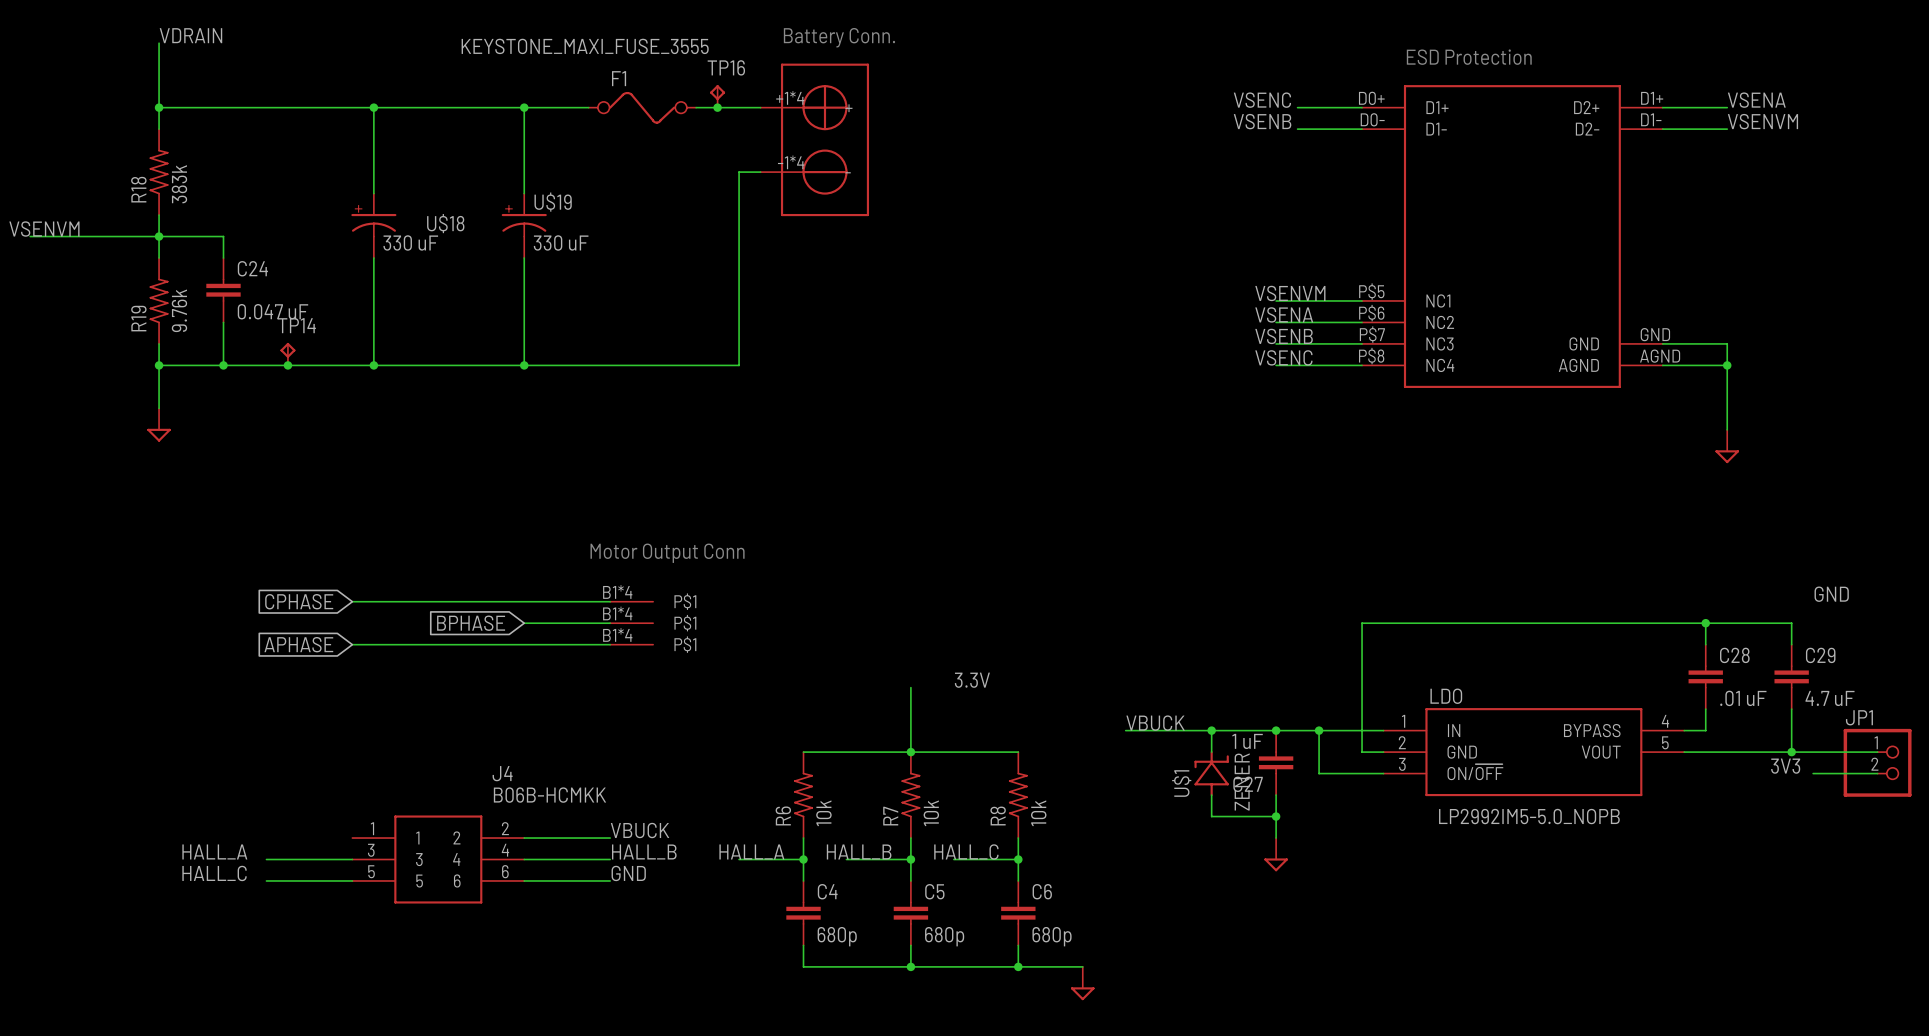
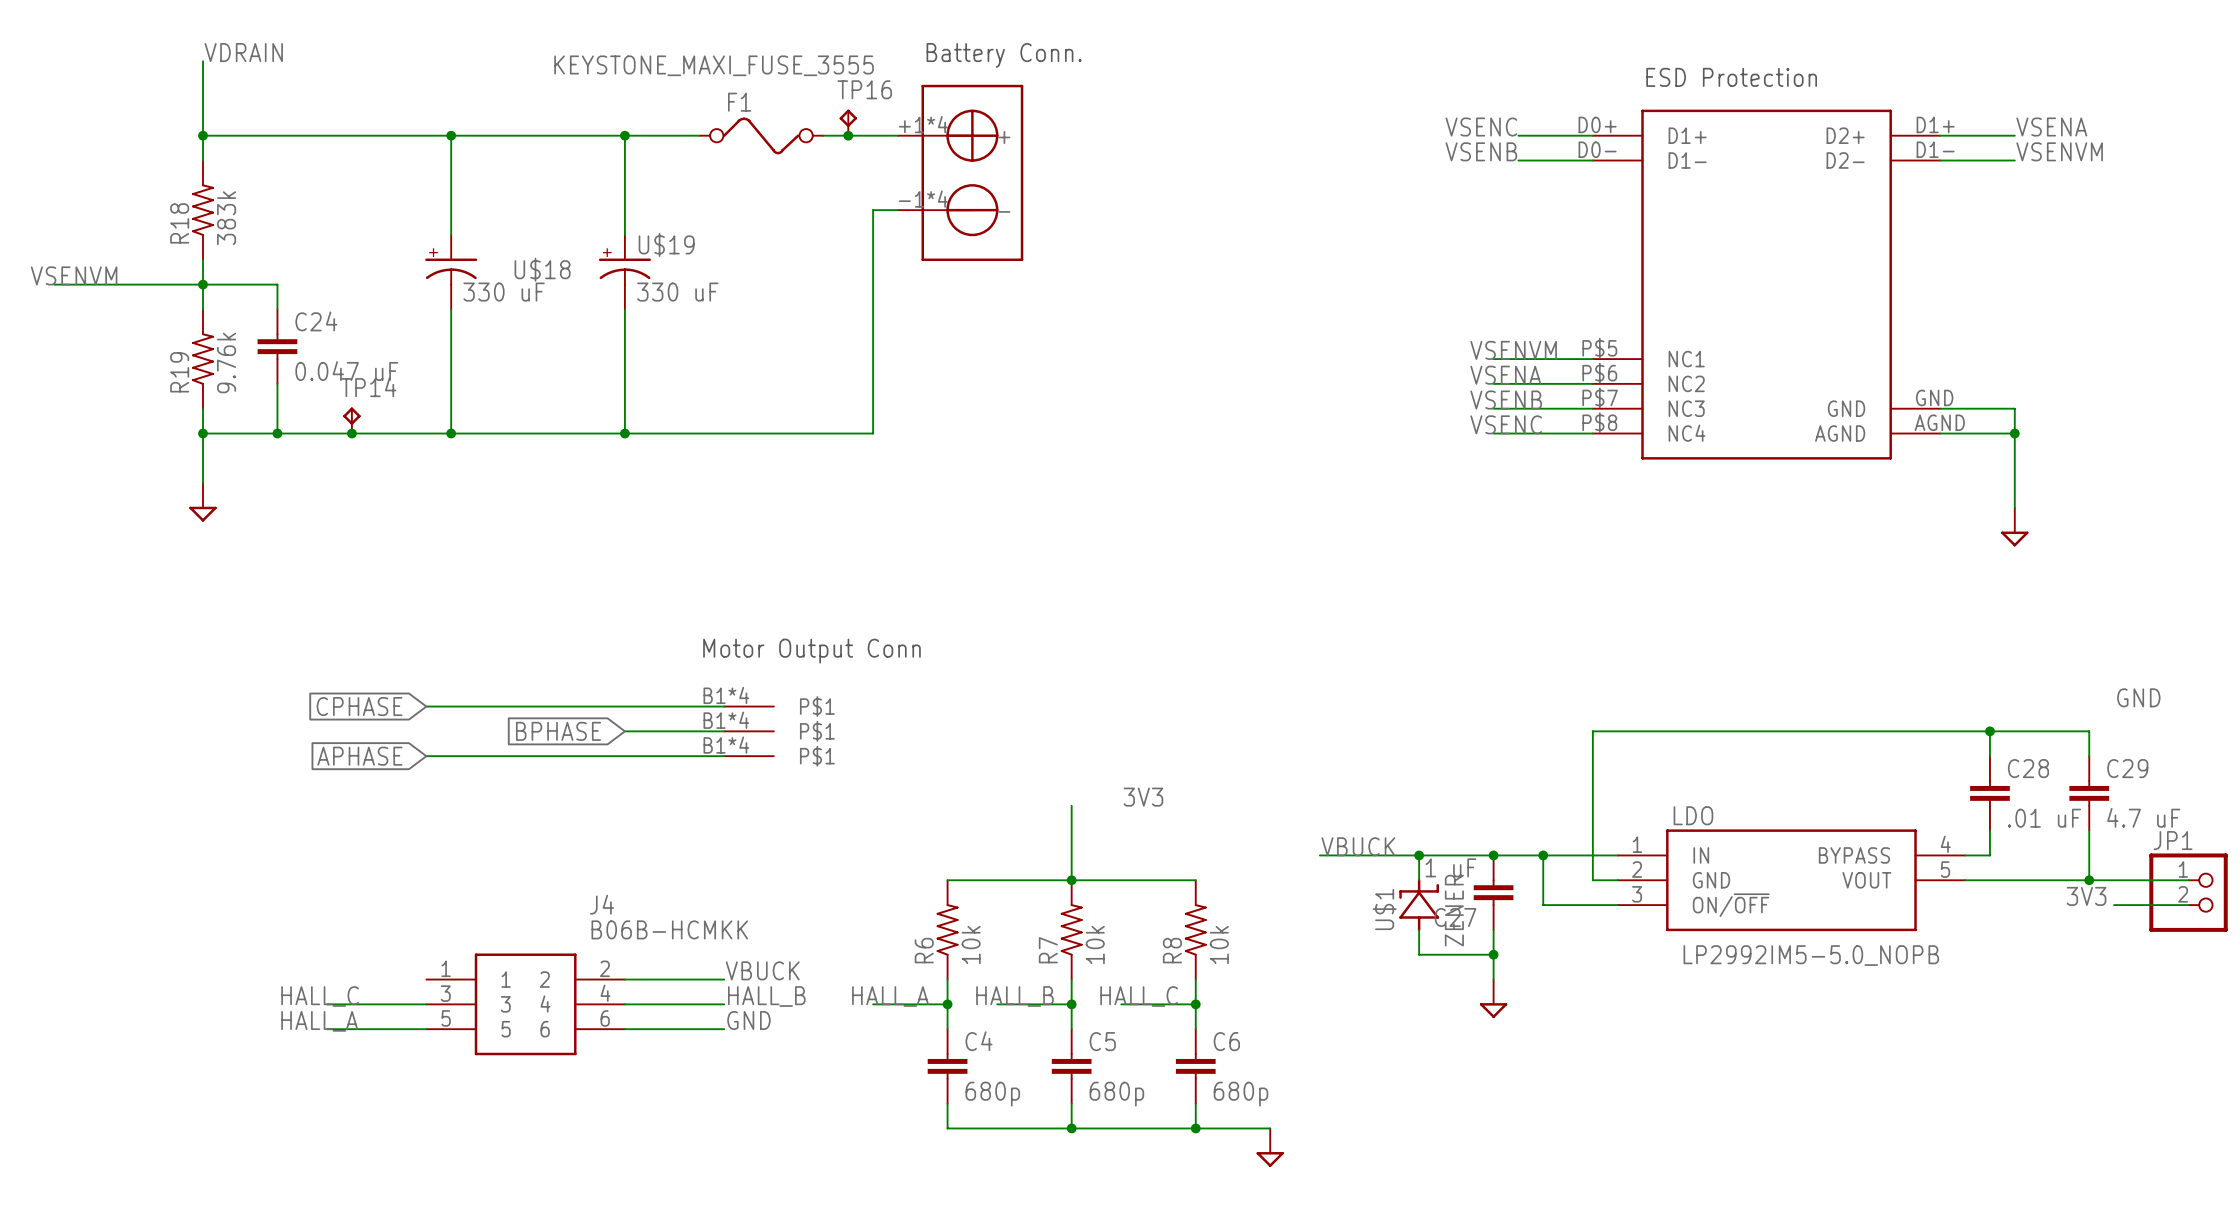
label: 3.3V (972, 680) -> 3V3 (1143, 797)
label position: HALL_A (214, 851) -> HALL_A (319, 1021)
label position: HALL_C (214, 873) -> HALL_C (320, 996)

